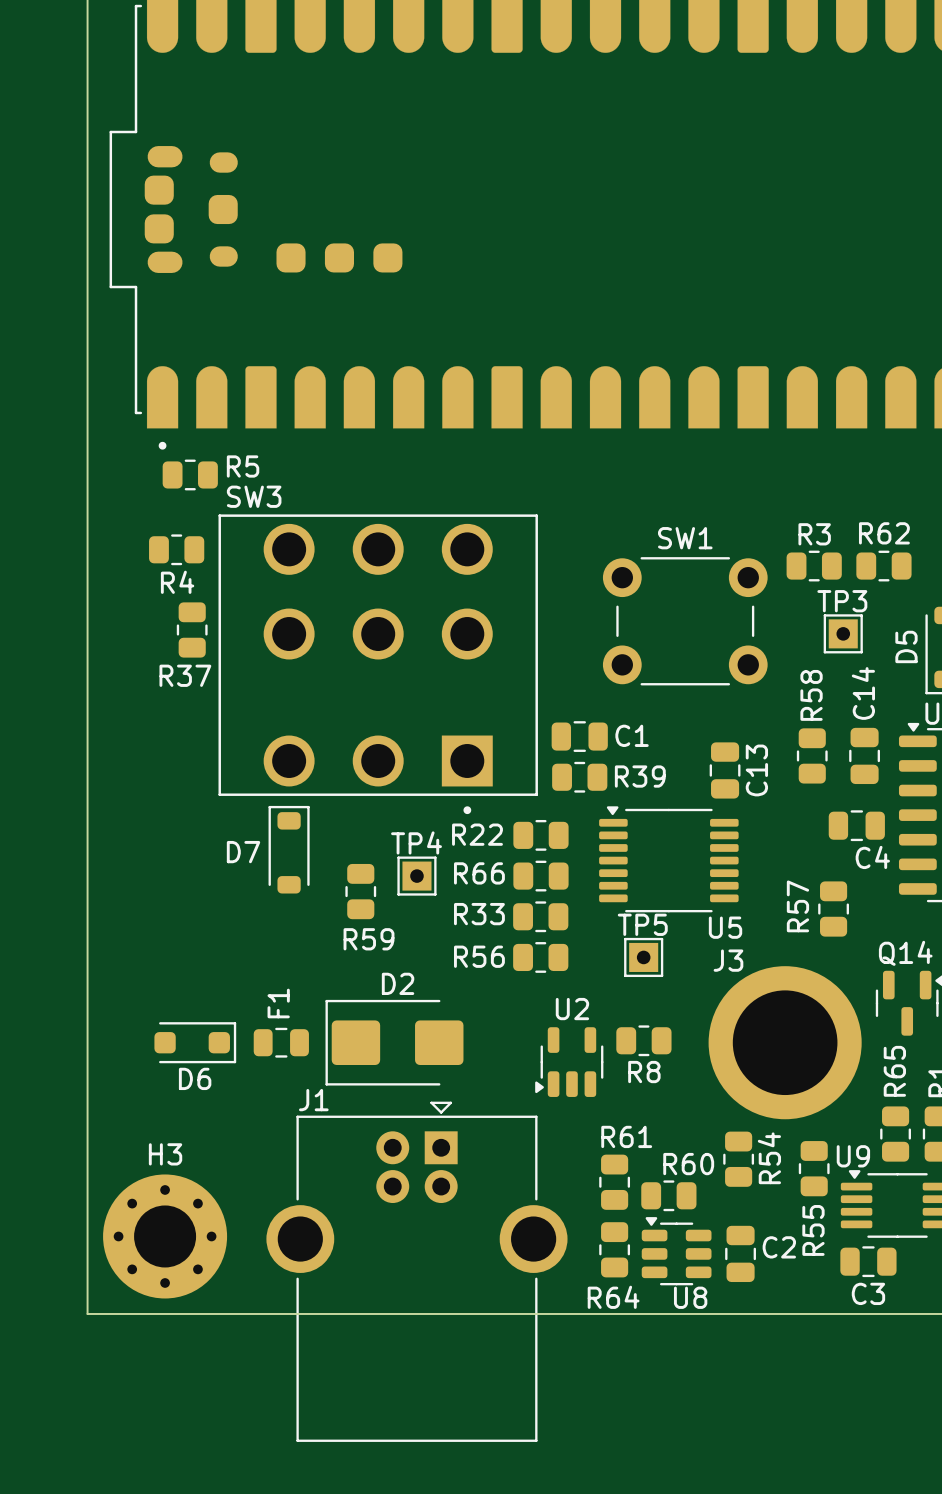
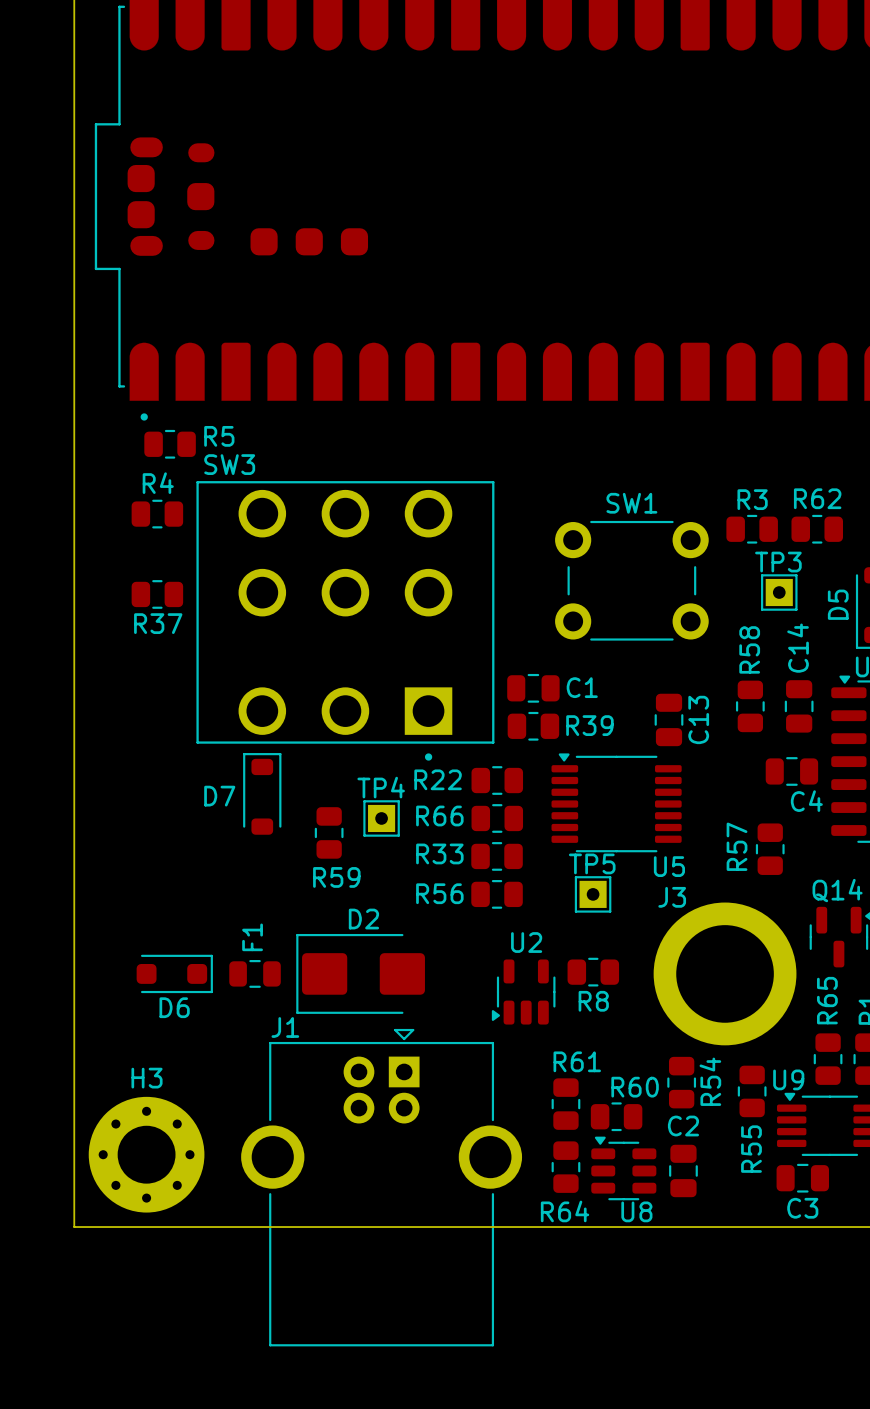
R4 name position: R4 (177, 582) -> R4 (158, 483)
R37 rotation: 0° (192, 629) -> 90° clockwise (157, 594)
C2 name position: C2 (779, 1247) -> C2 (683, 1126)

